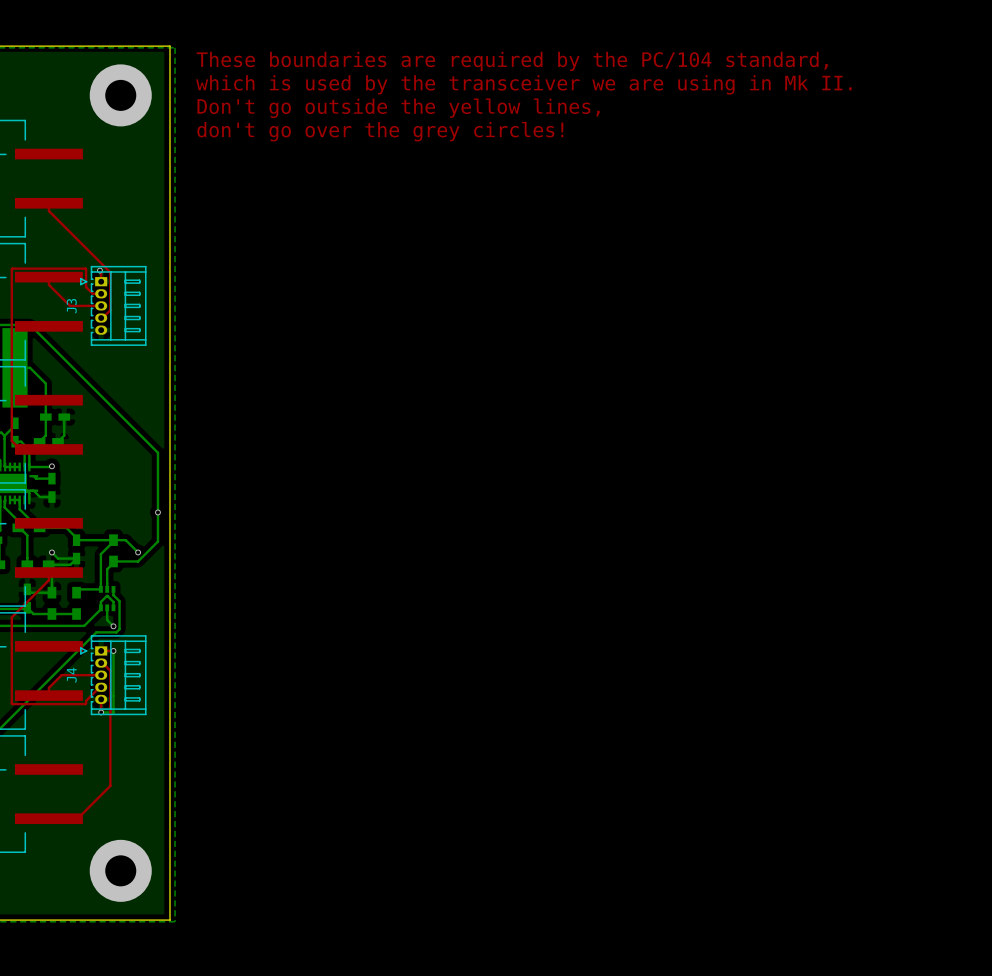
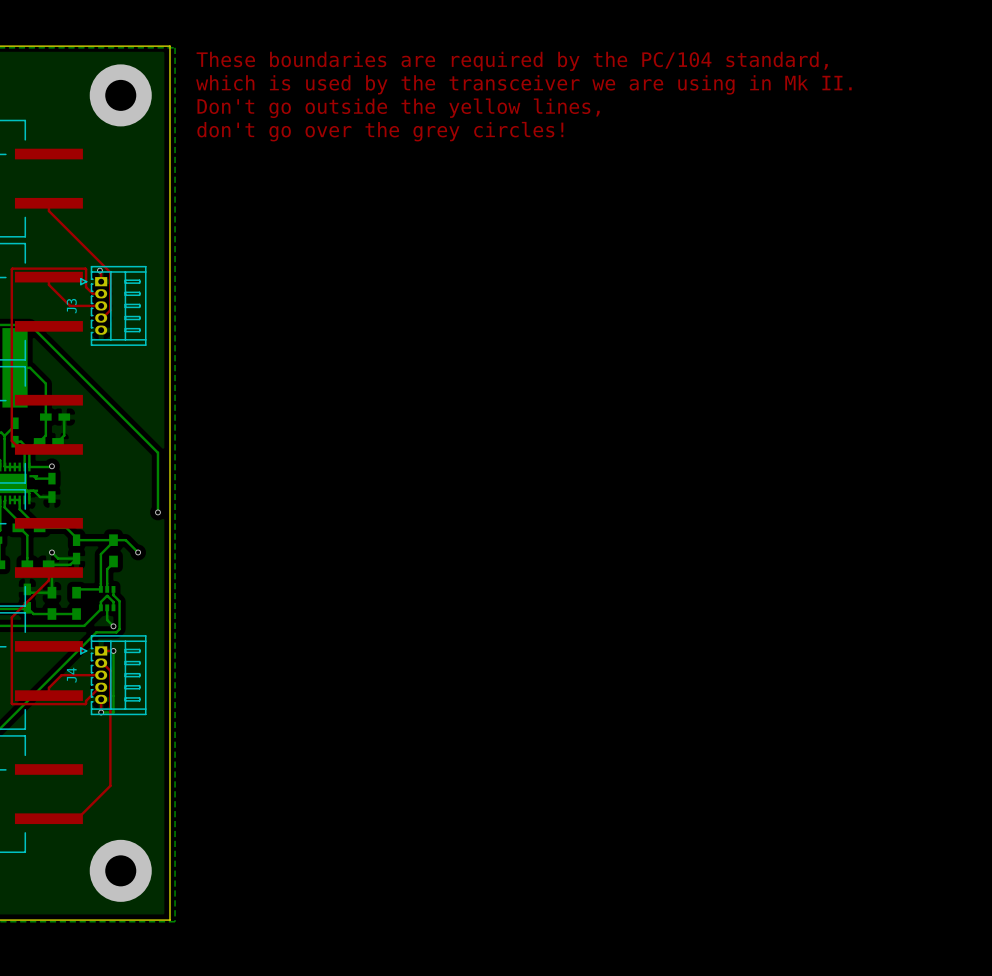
bottom track: (157, 512) (157, 541) (138, 561) (113, 561) -> none

